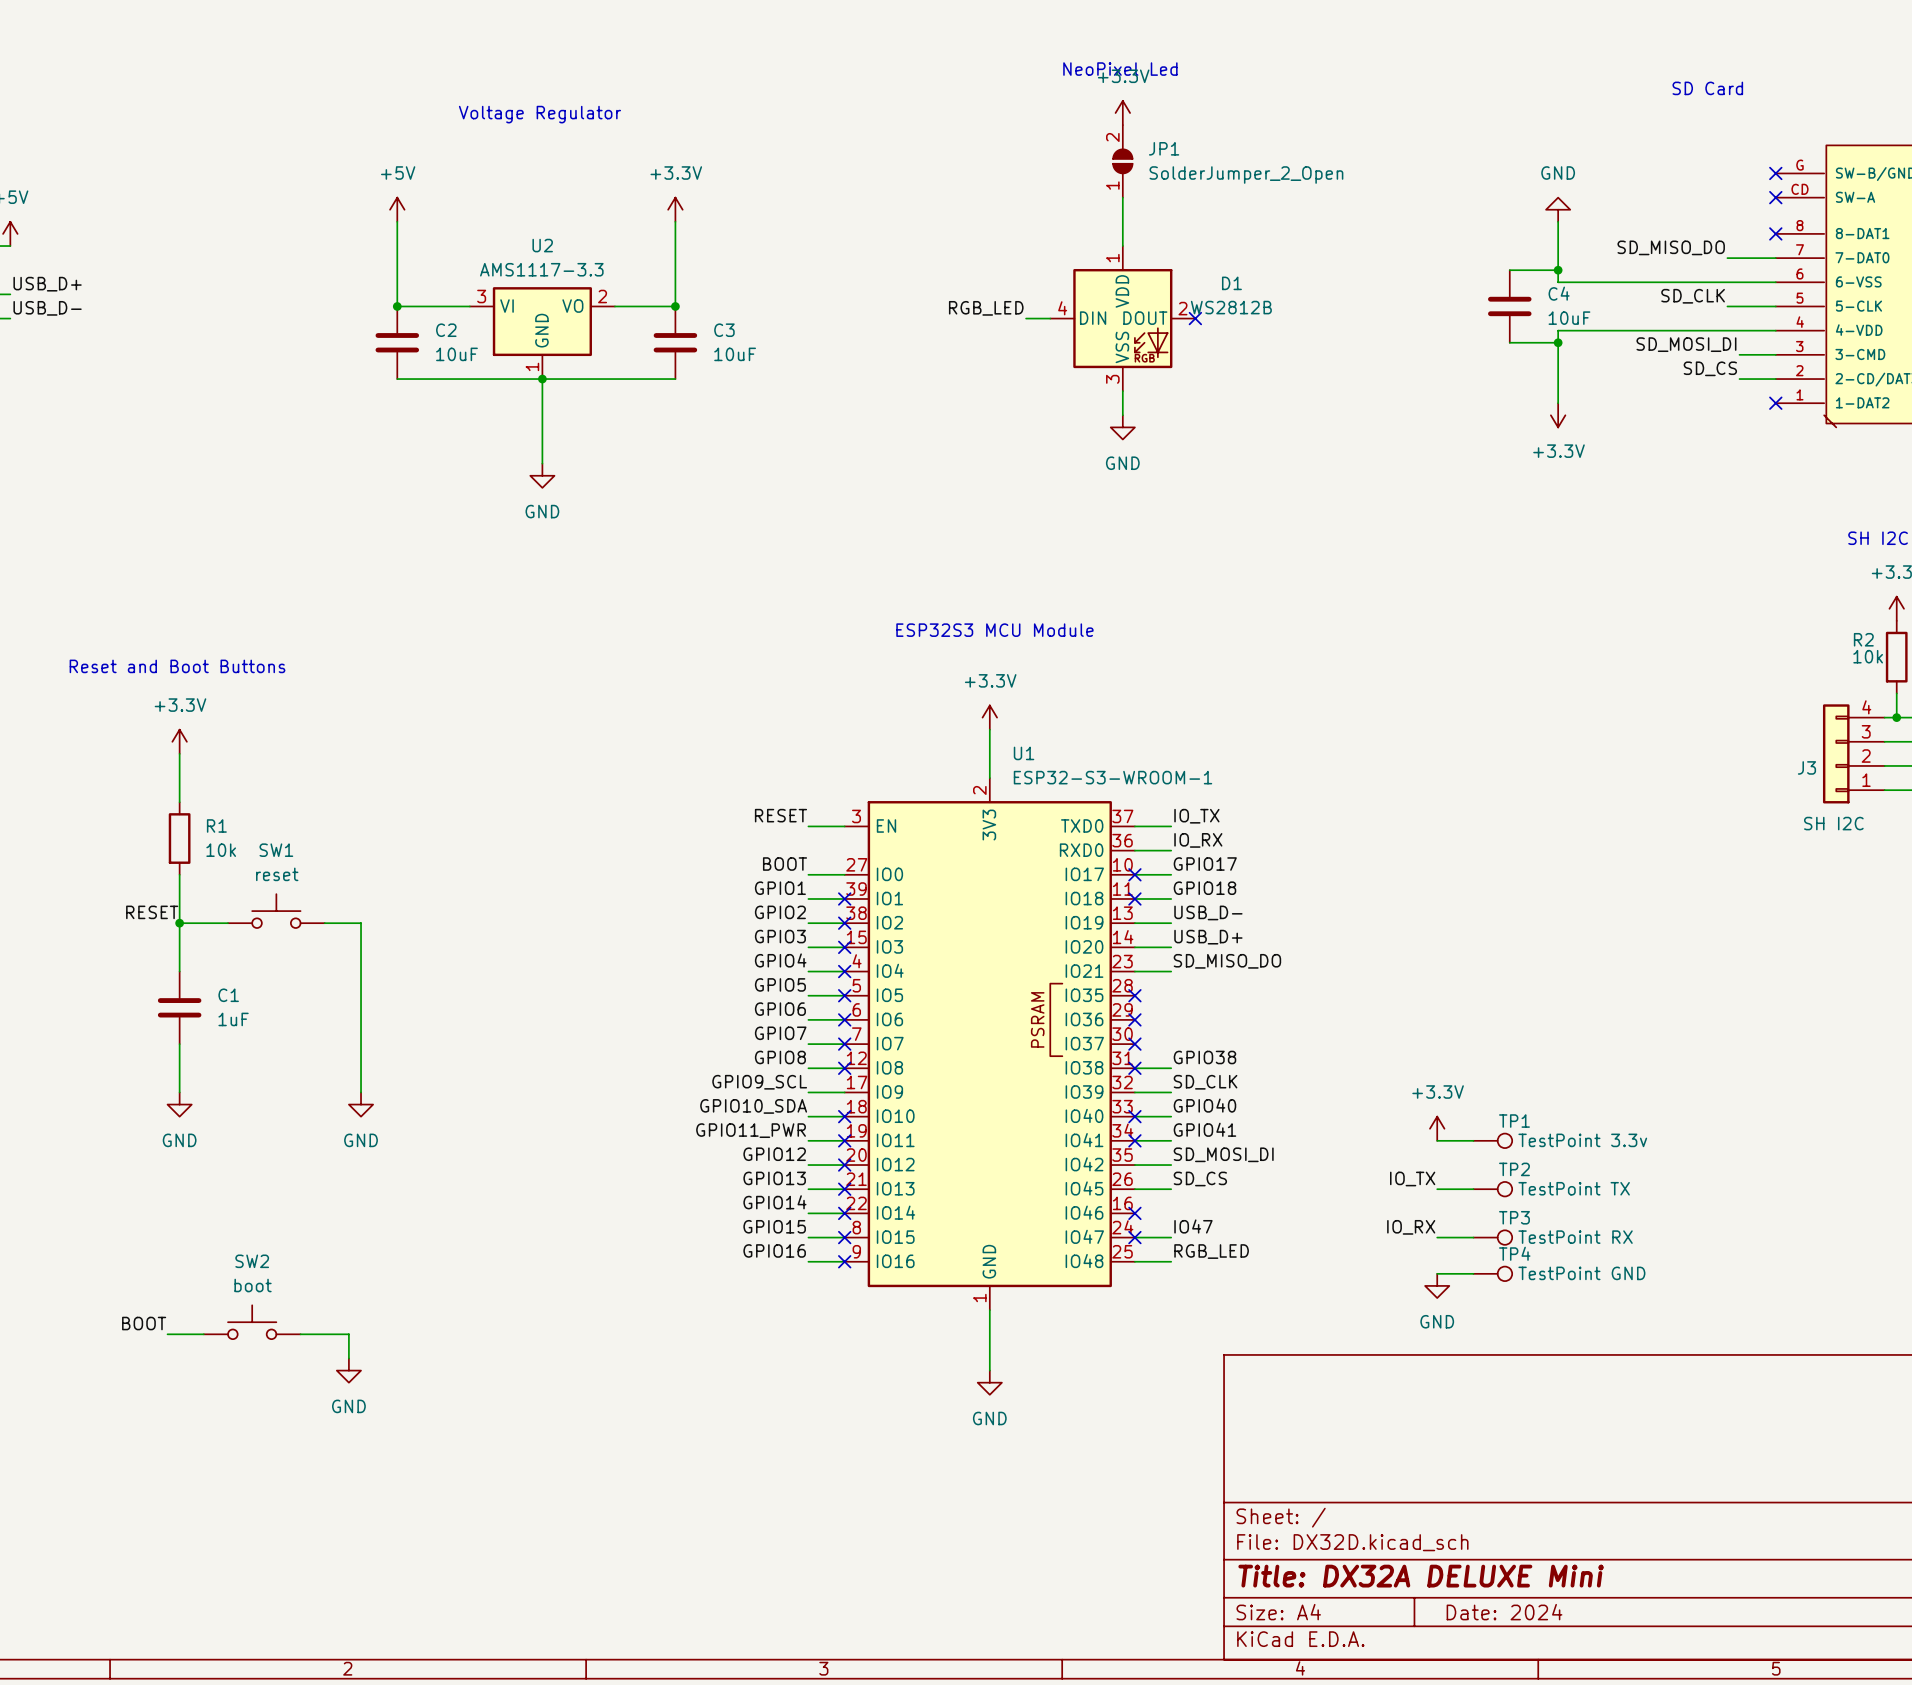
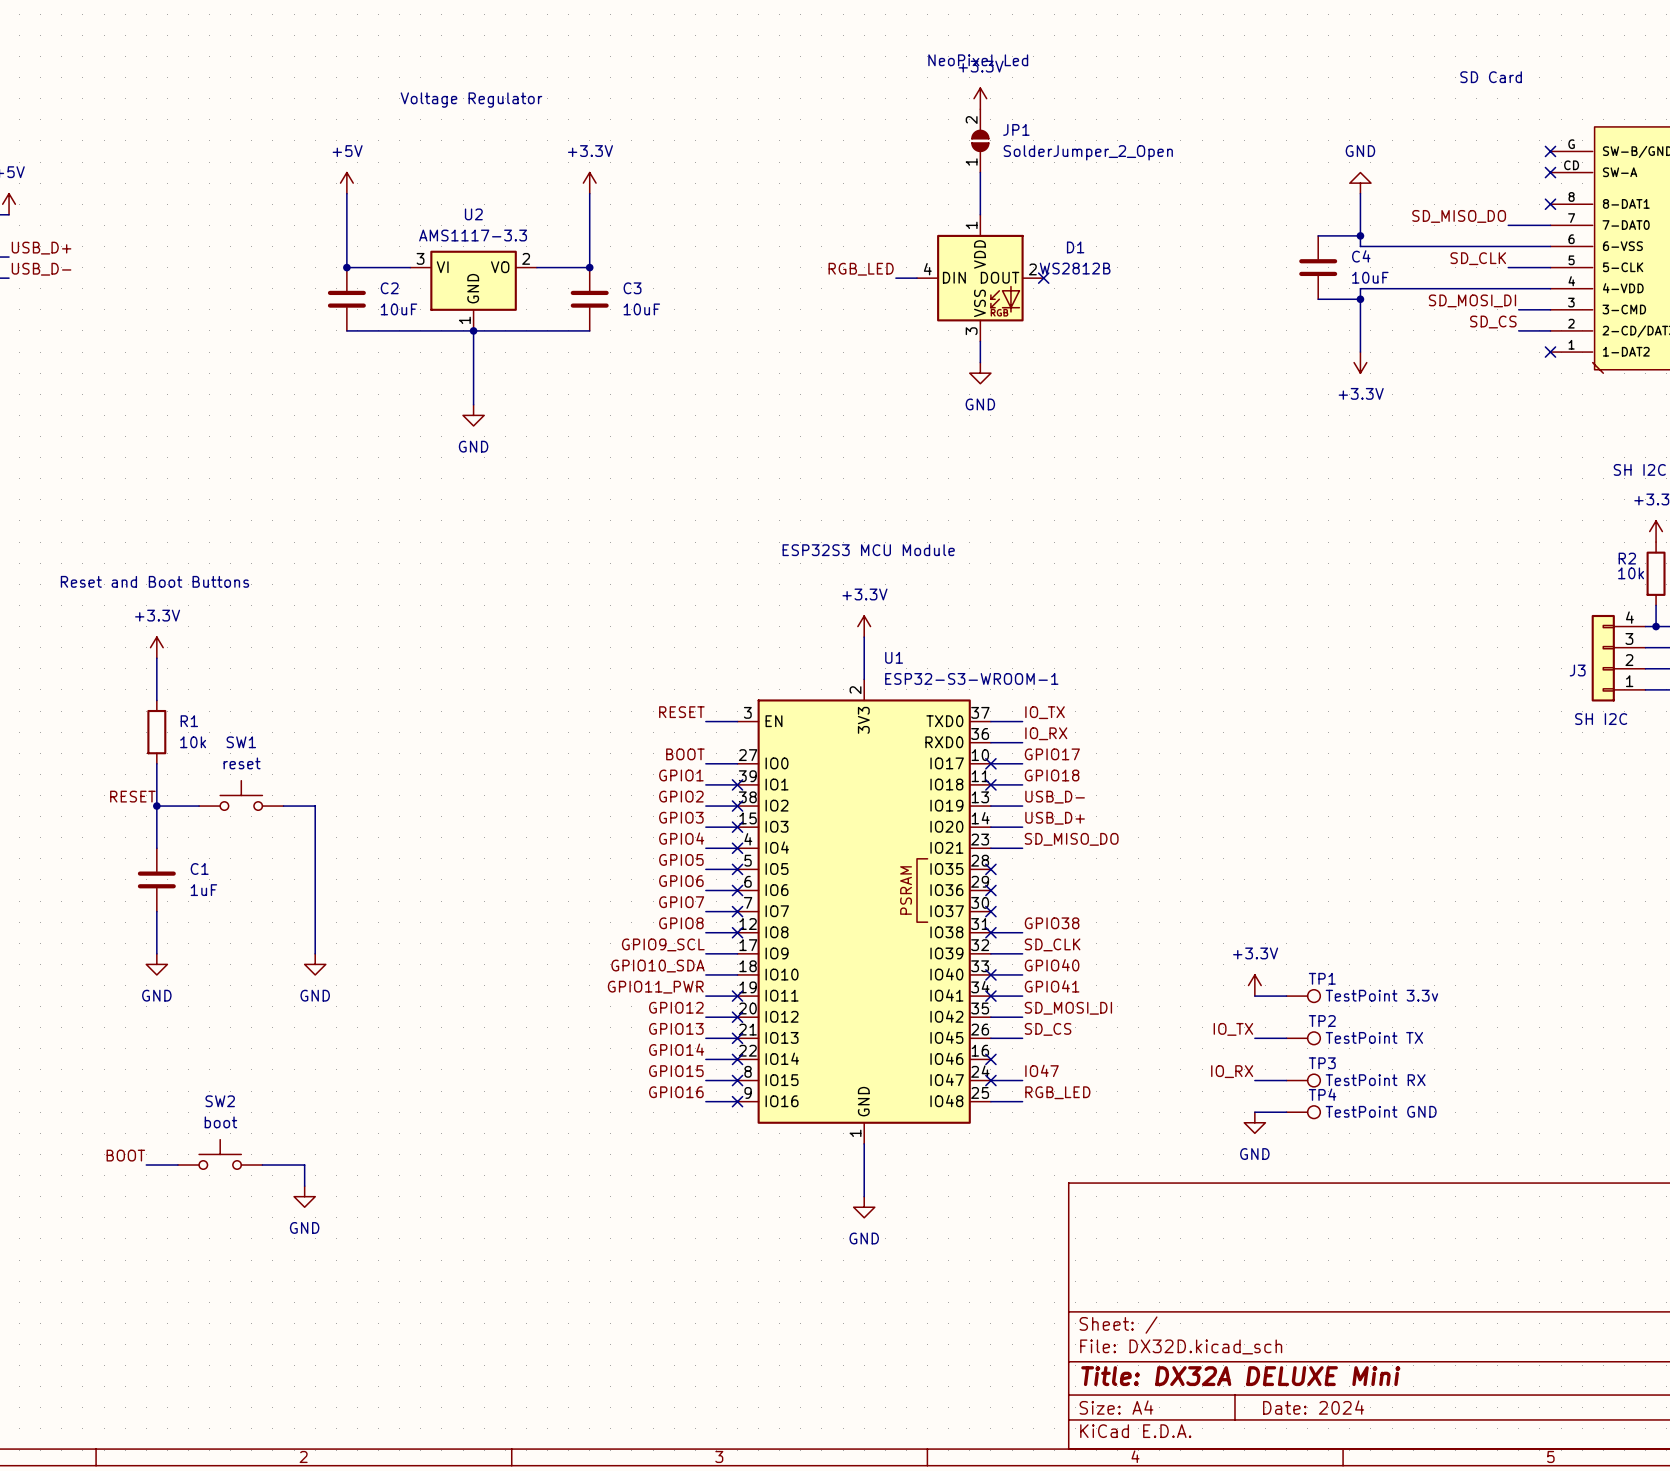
no-connect mark: (844, 1116) -> none

